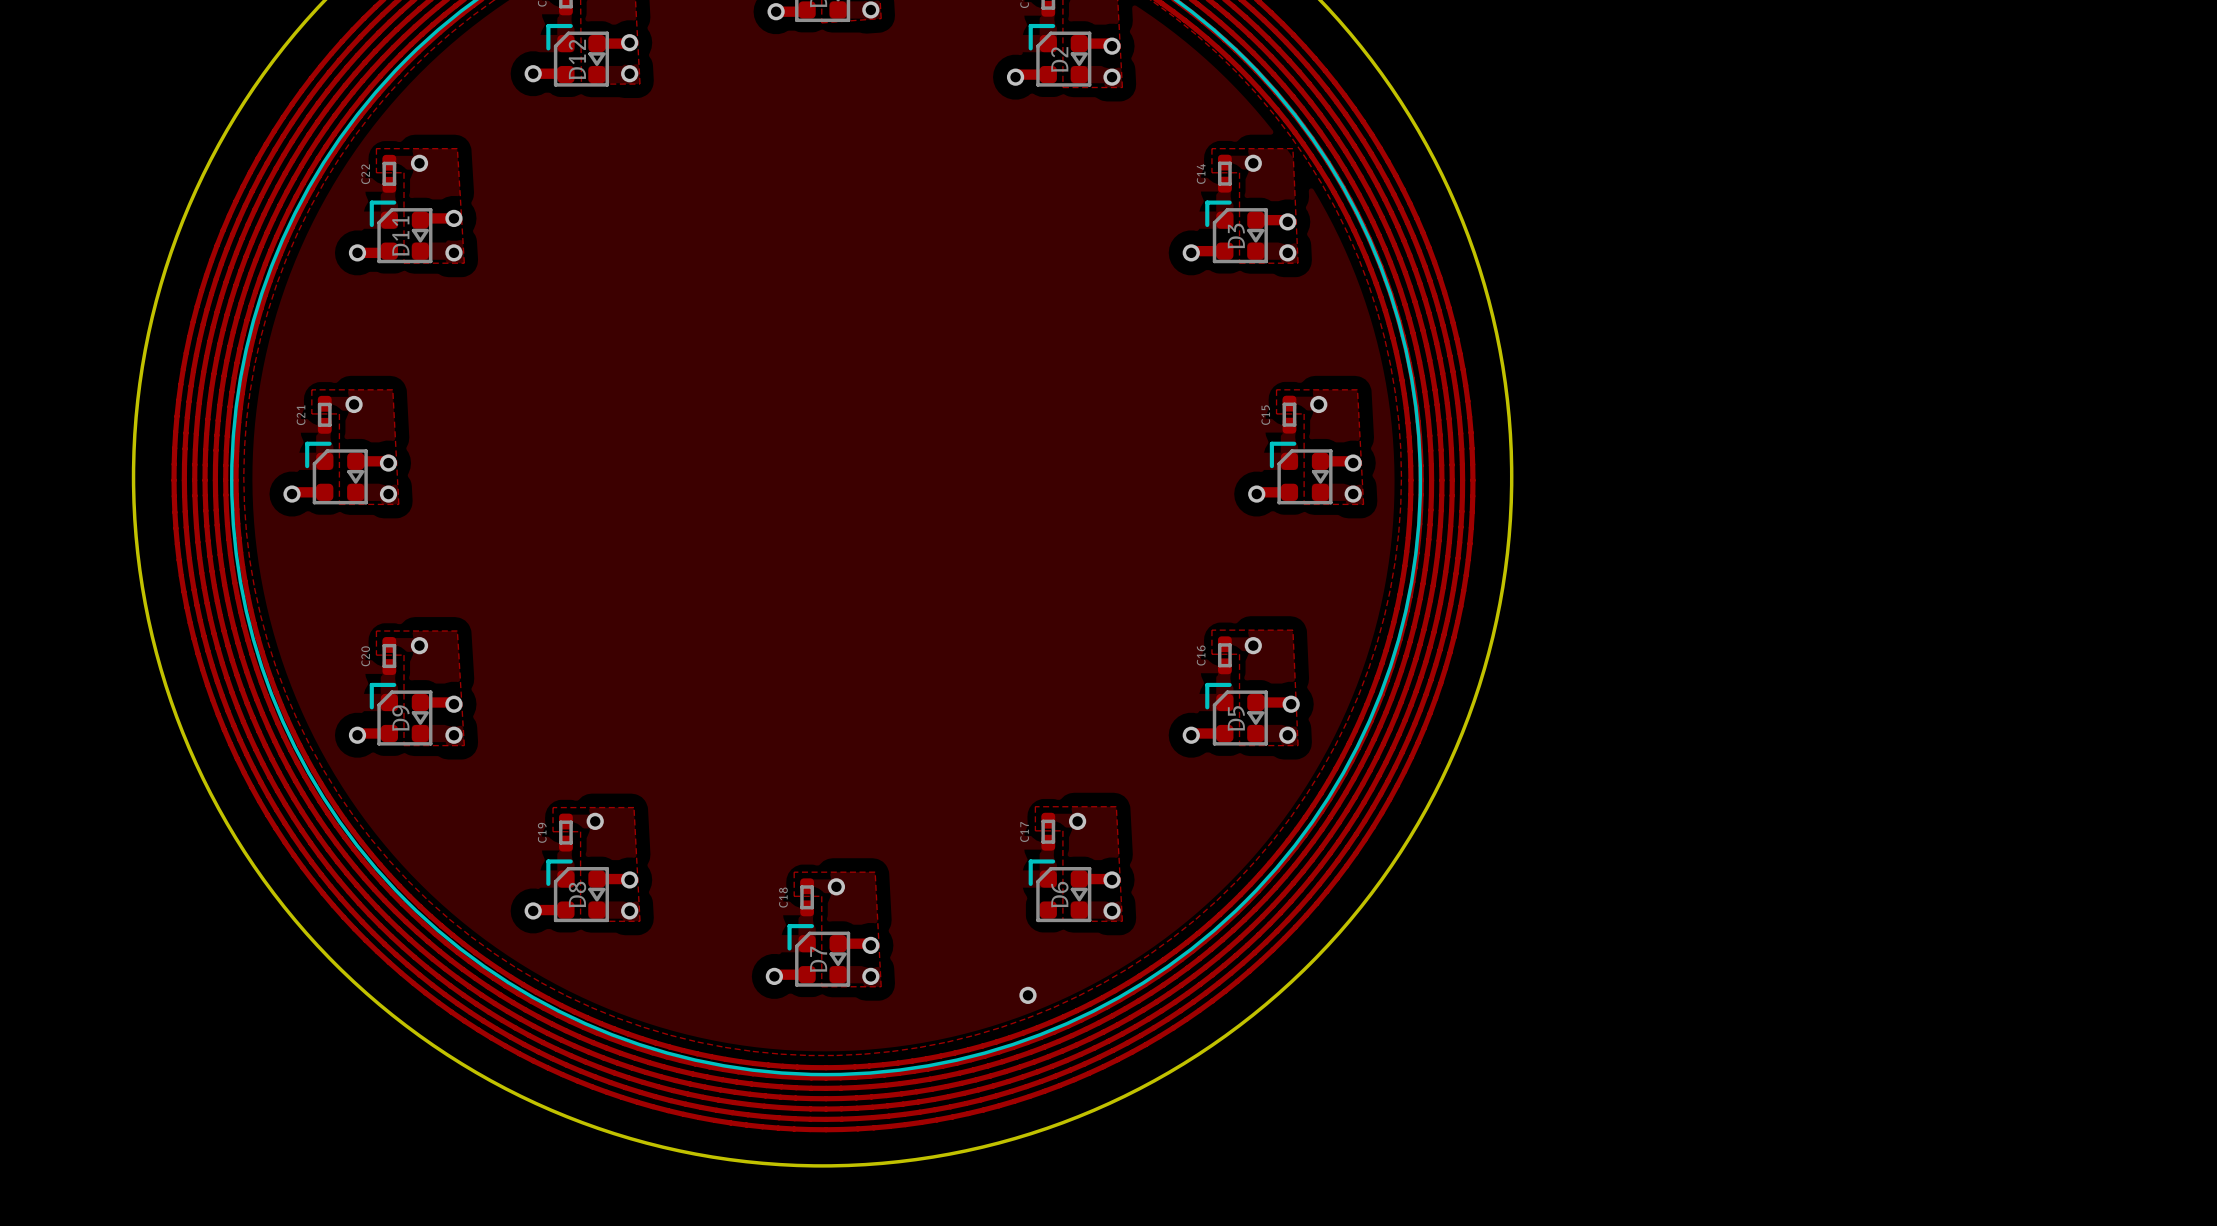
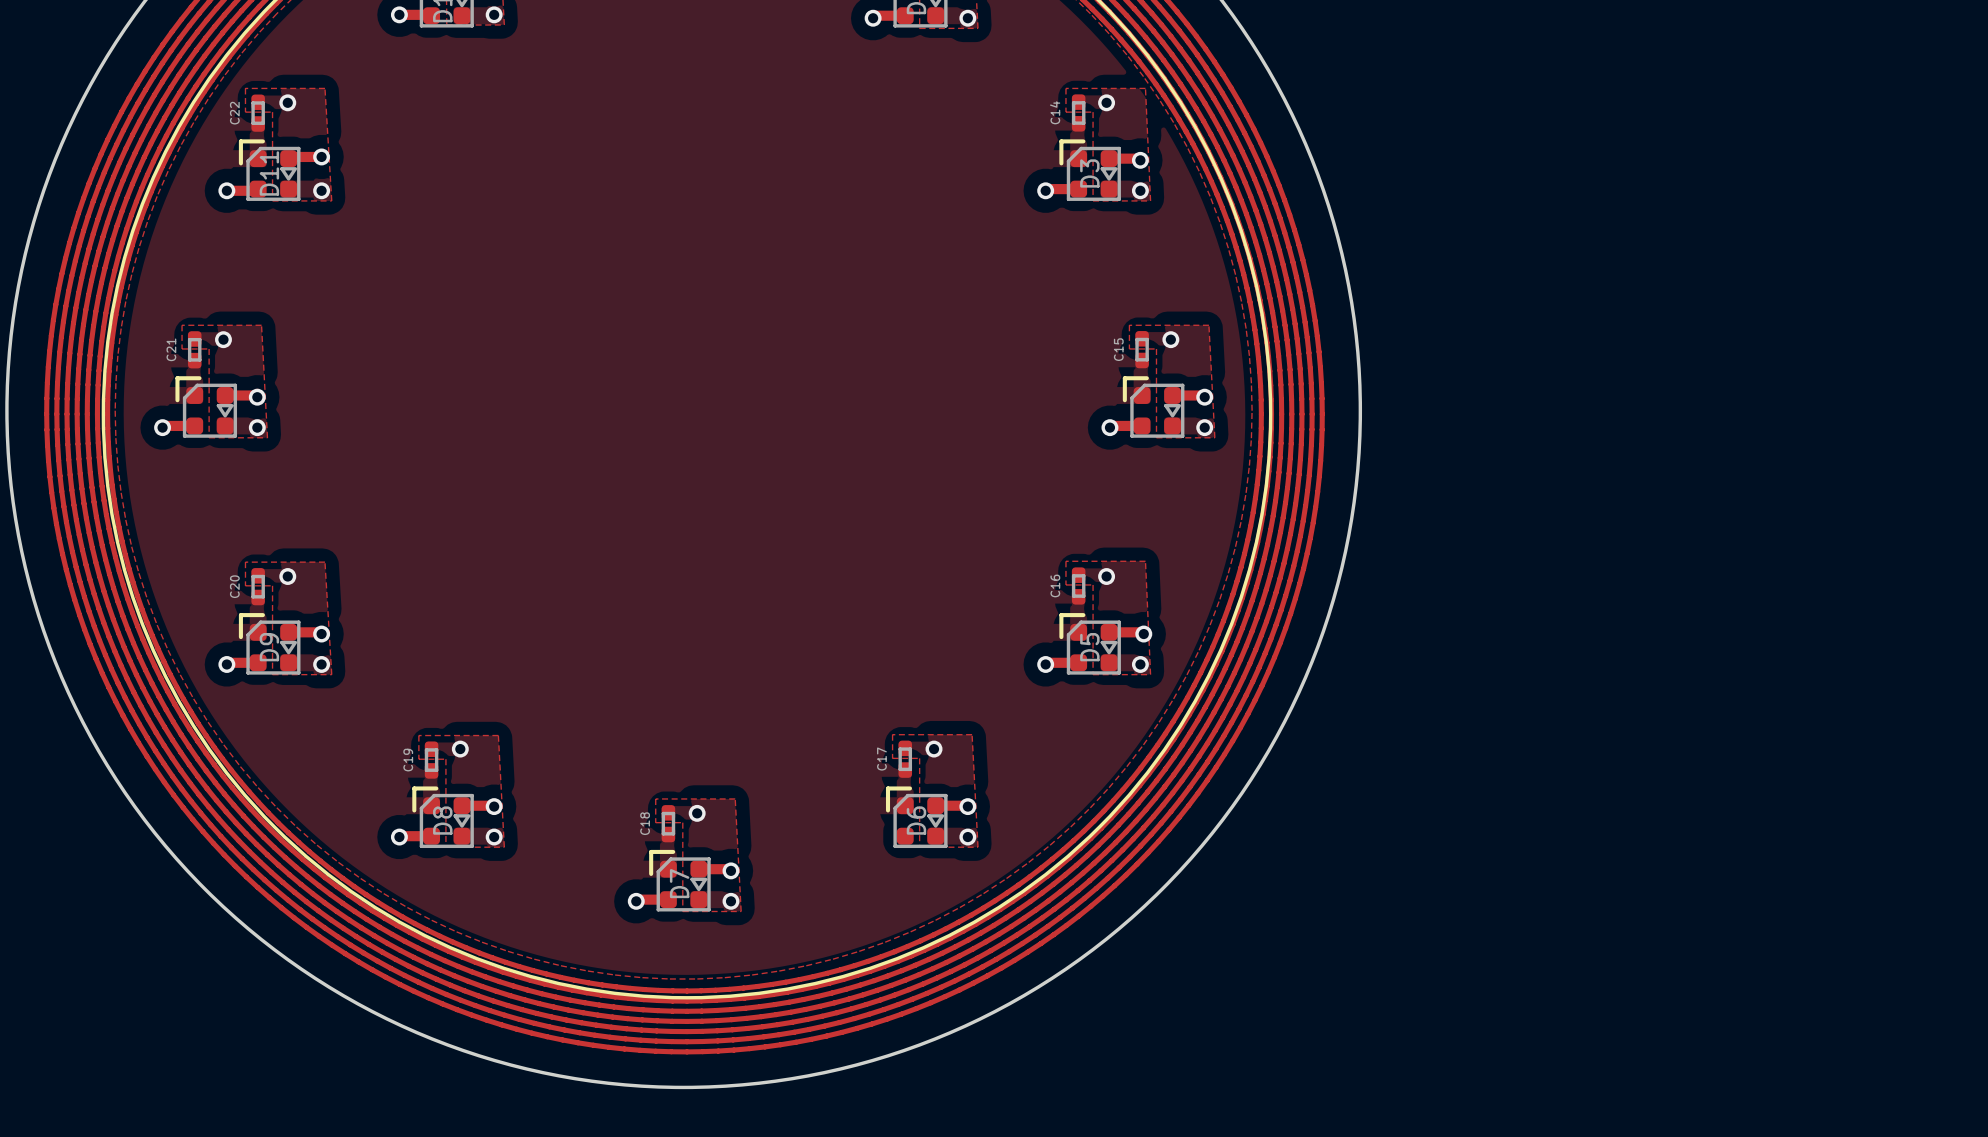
via: (1027, 995) -> none

